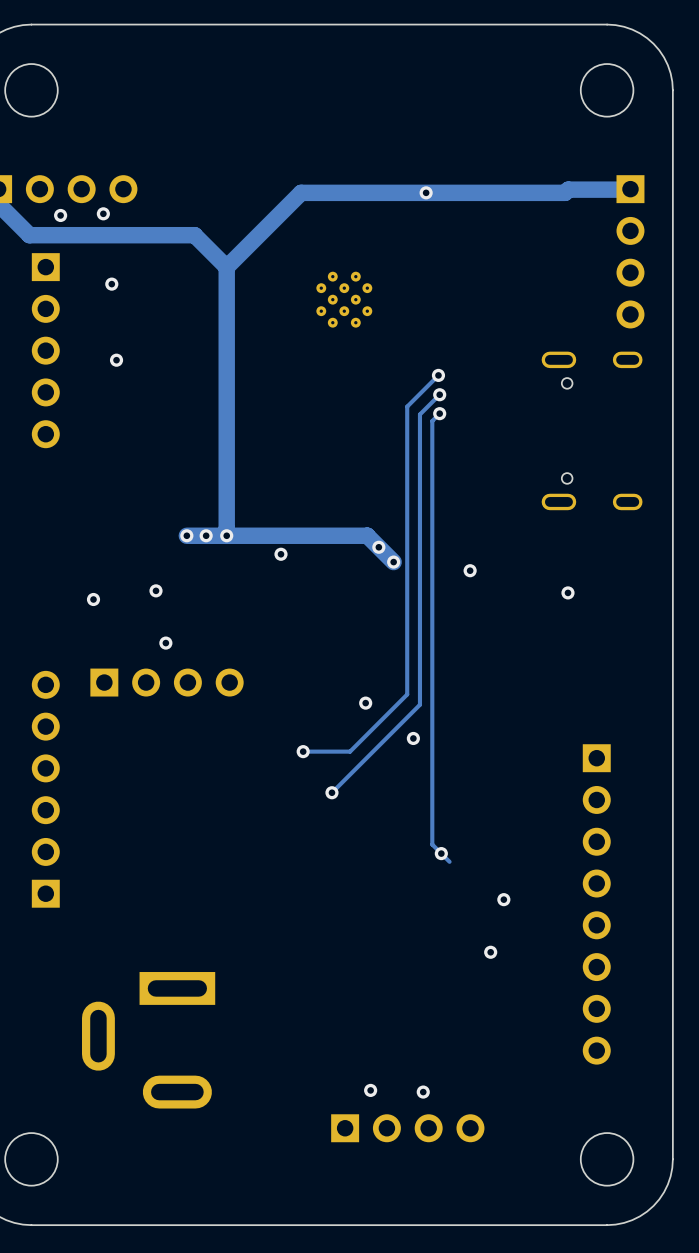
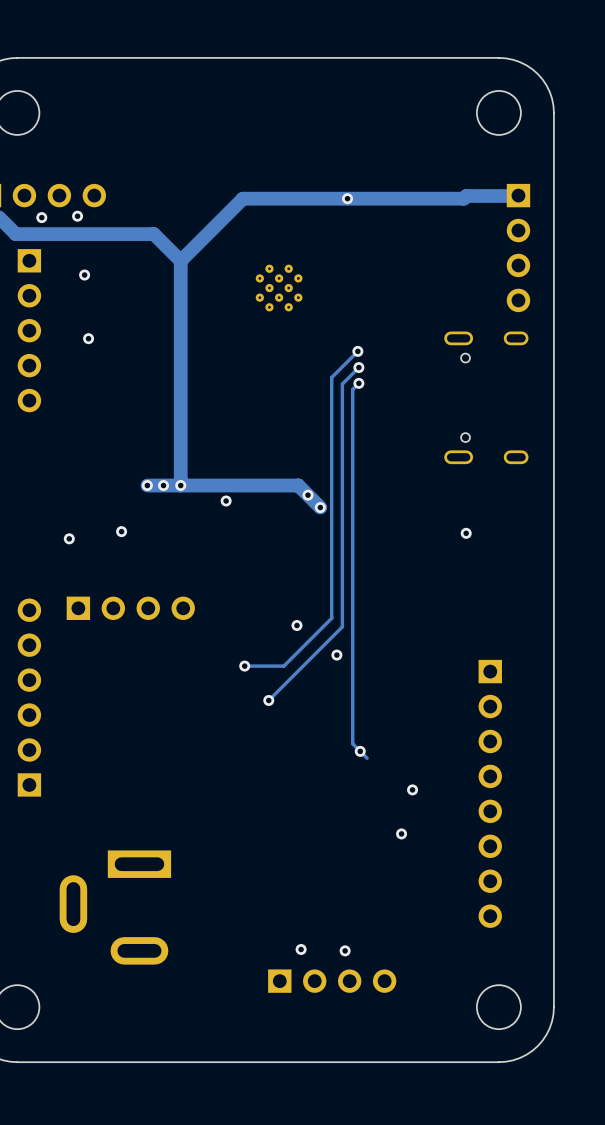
via: (470, 570) -> none
via: (165, 643) -> none

